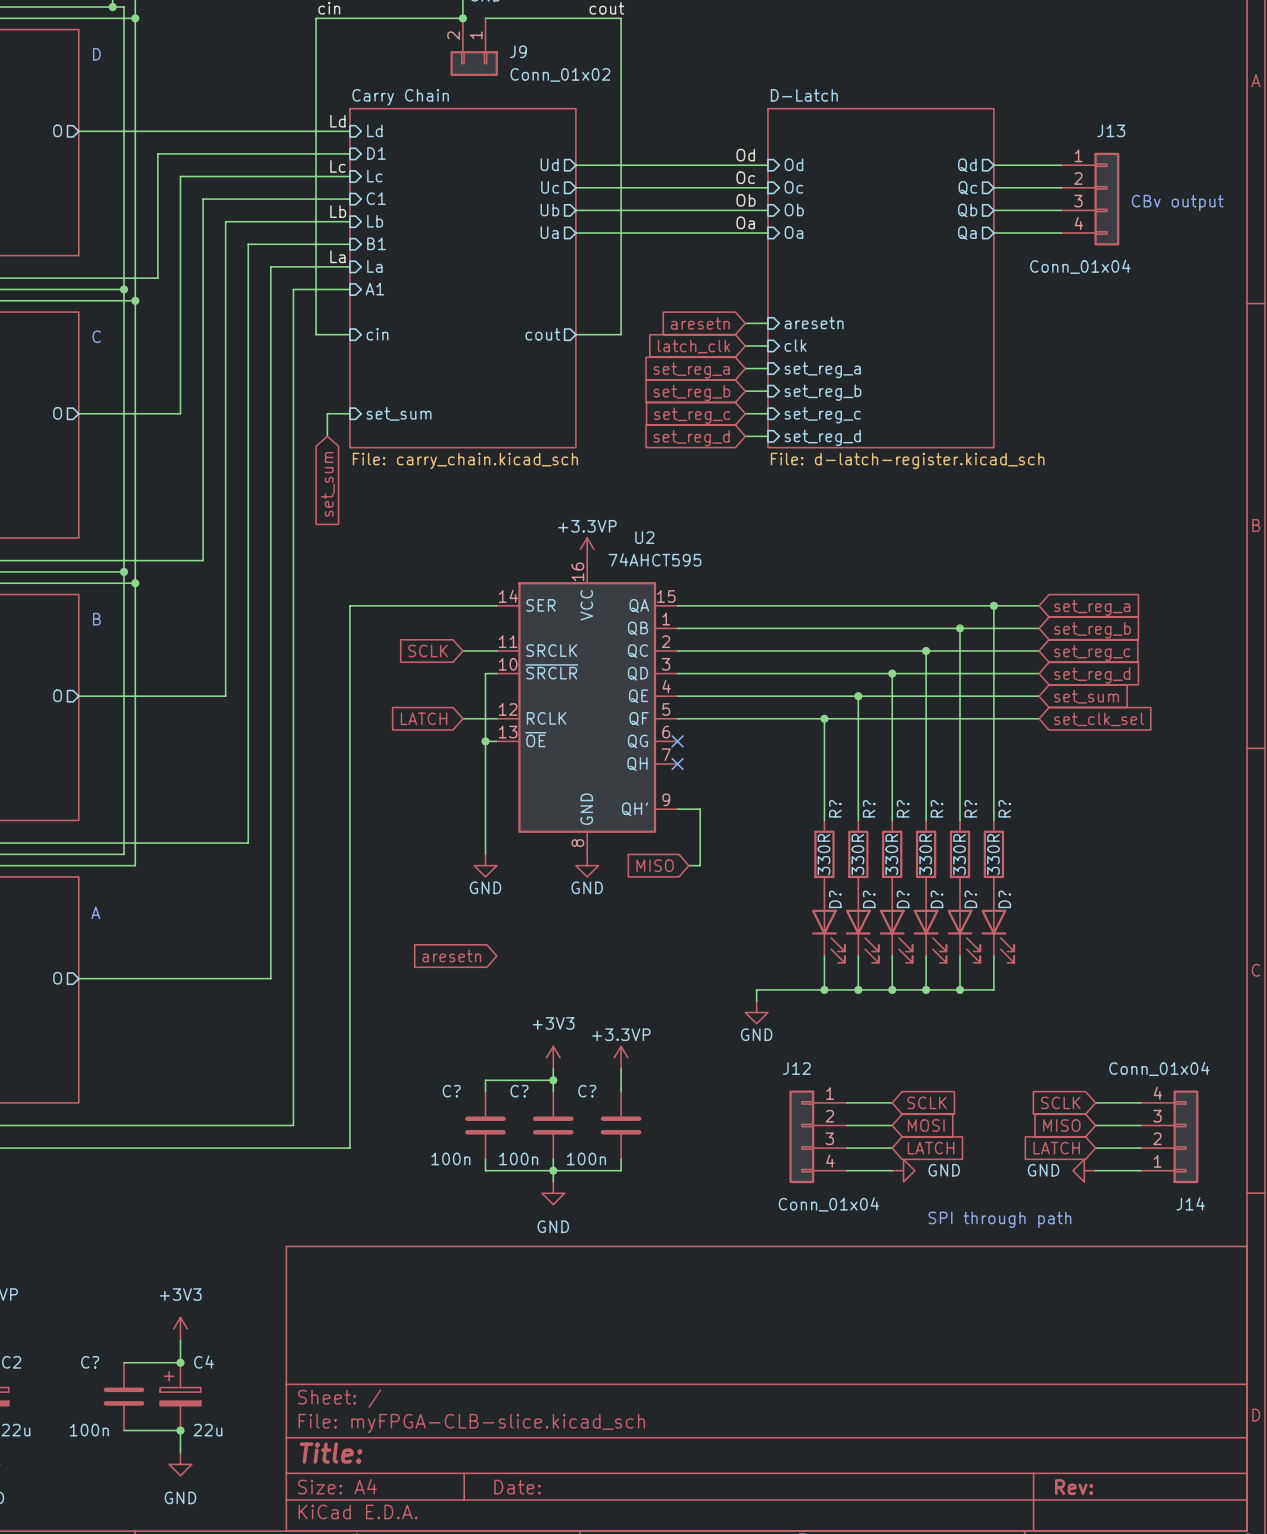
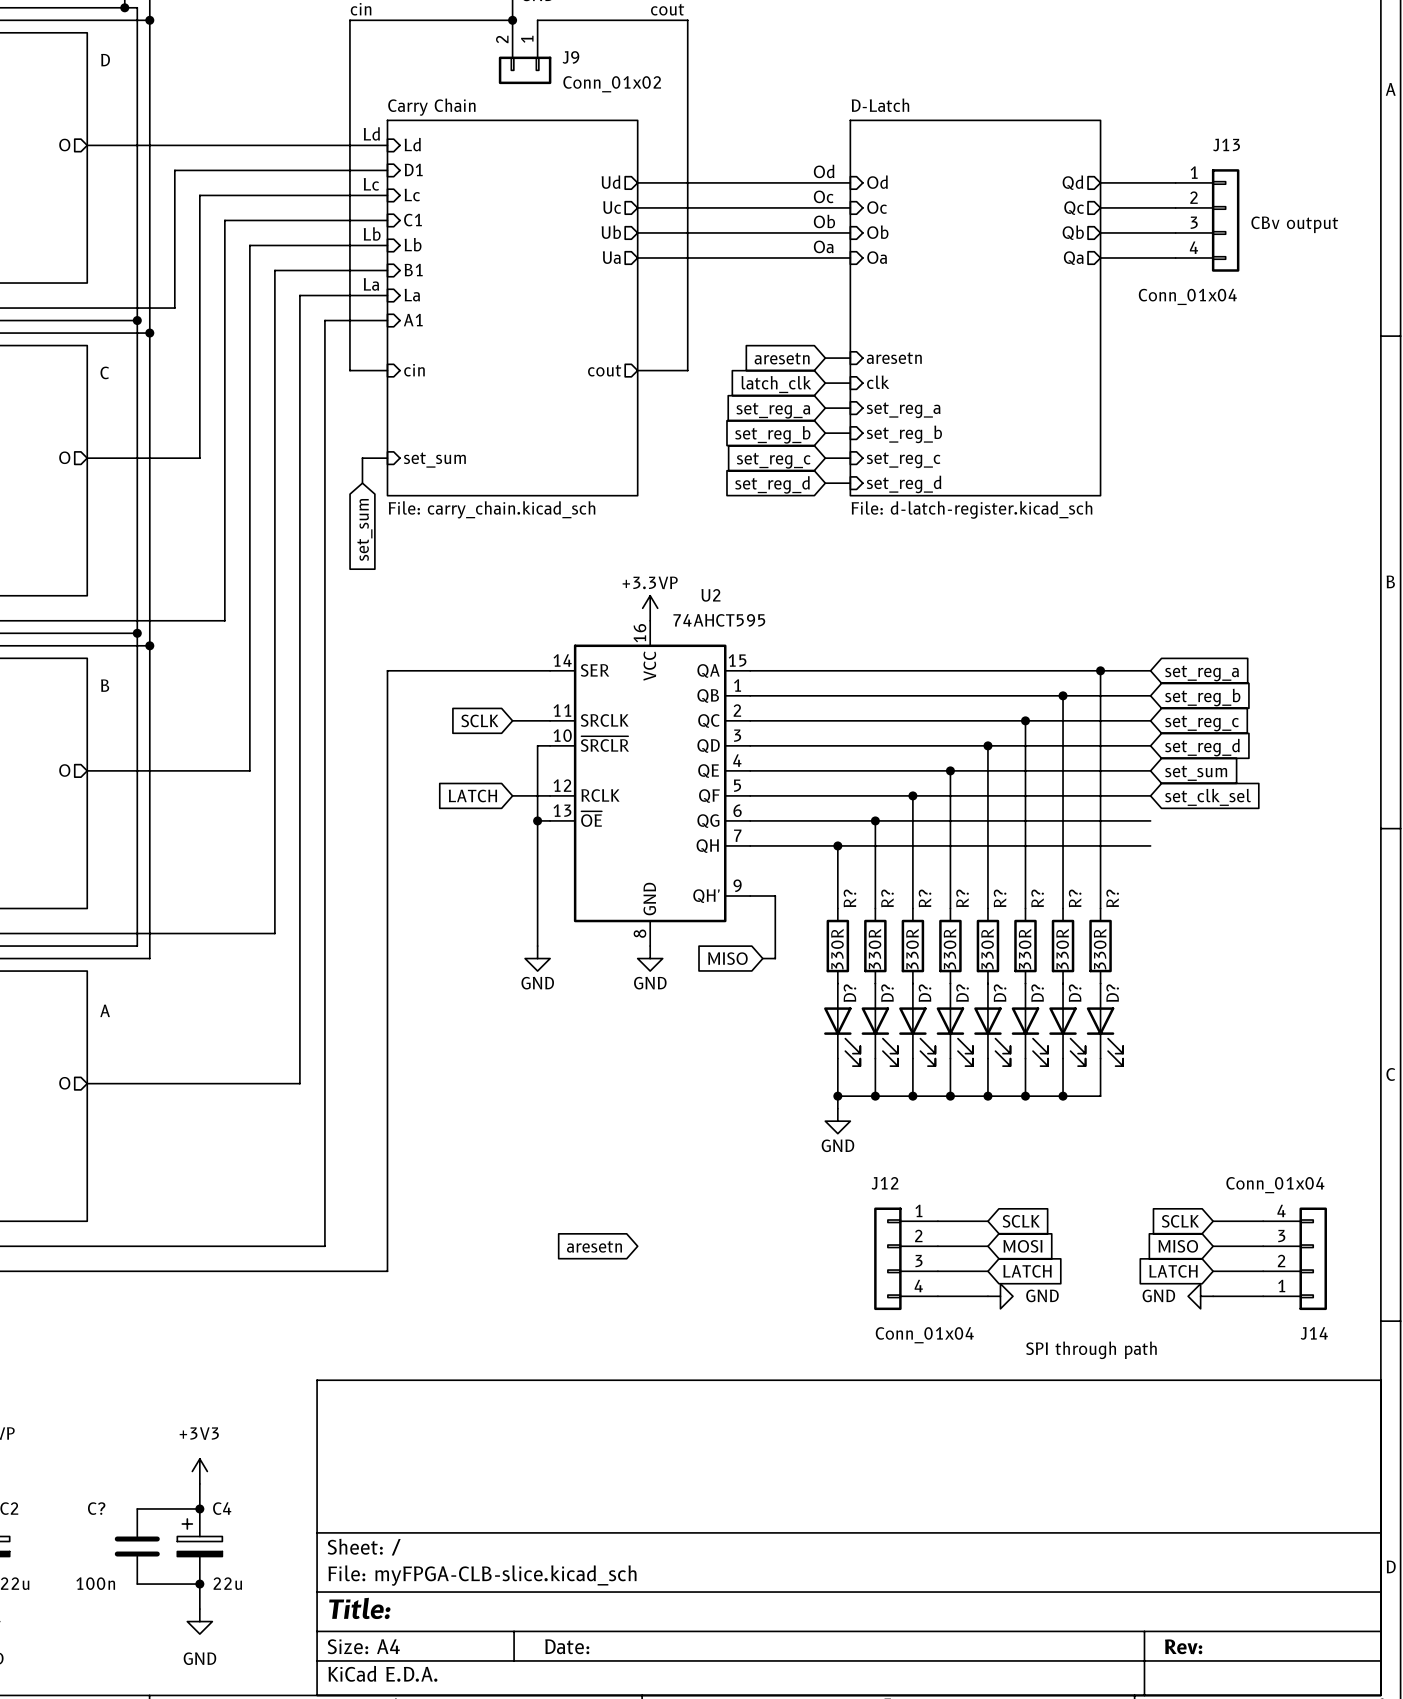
wire: none -> (750, 820) (1150, 820)
no-connect mark: (677, 741) -> none
wire: none -> (875, 820) (875, 908)
junction: none -> (875, 820)
wire: none -> (750, 845) (1150, 845)
no-connect mark: (677, 763) -> none
wire: none -> (837, 845) (837, 908)
junction: none -> (837, 845)
R?: none -> 330R (837, 946)
R?: none -> 330R (875, 946)
D?: none -> (842, 1024)
D?: none -> (879, 1024)
global label position: aresetn (451, 956) -> aresetn (594, 1246)
wire: none -> (837, 1058) (837, 1096)
wire: none -> (875, 1058) (875, 1096)
junction: none -> (837, 1096)
junction: none -> (875, 1096)
power symbol: +3V3 (553, 1057) -> none
power symbol: +3.3VP (621, 1057) -> none
wire: (553, 1069) (553, 1091) -> none
wire: (621, 1069) (621, 1091) -> none
wire: (553, 1080) (485, 1080) (485, 1091) -> none
junction: (553, 1080) -> none
C?: 100n (485, 1125) -> none
C?: 100n (553, 1125) -> none
C?: 100n (621, 1125) -> none
wire: (485, 1159) (485, 1170) (621, 1170) (621, 1159) -> none
wire: (553, 1159) (553, 1181) -> none
junction: (553, 1170) -> none
power symbol: GND (553, 1193) -> none

